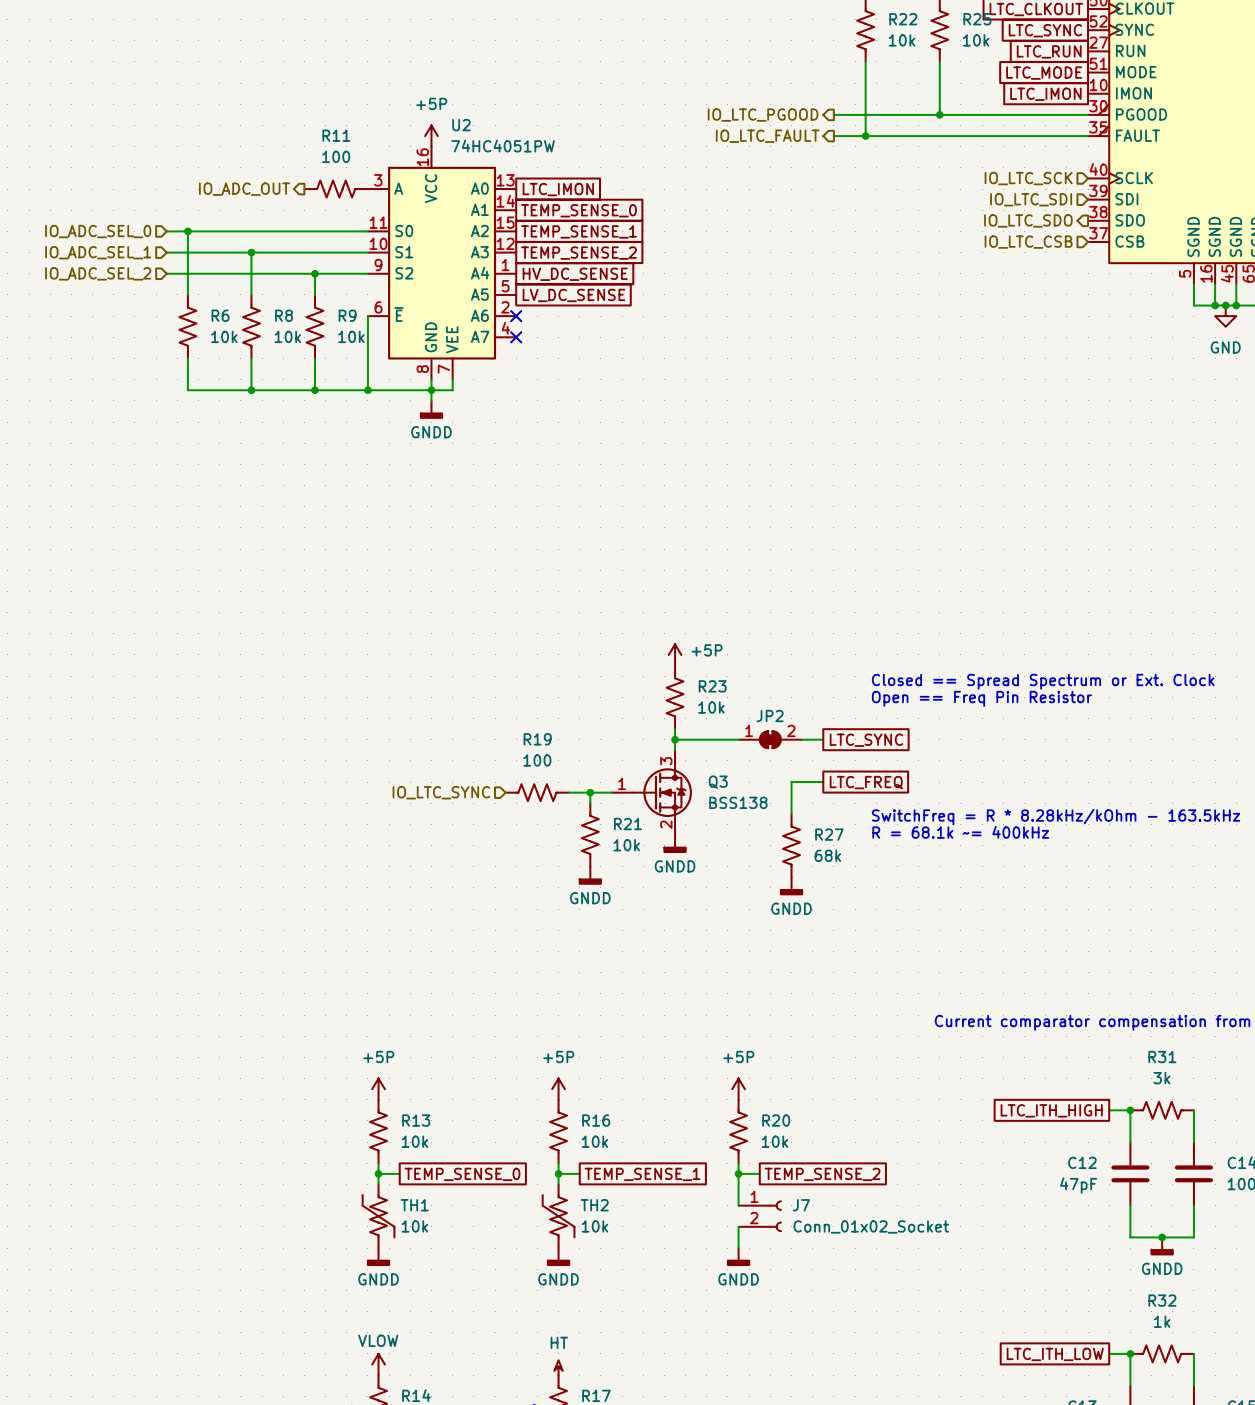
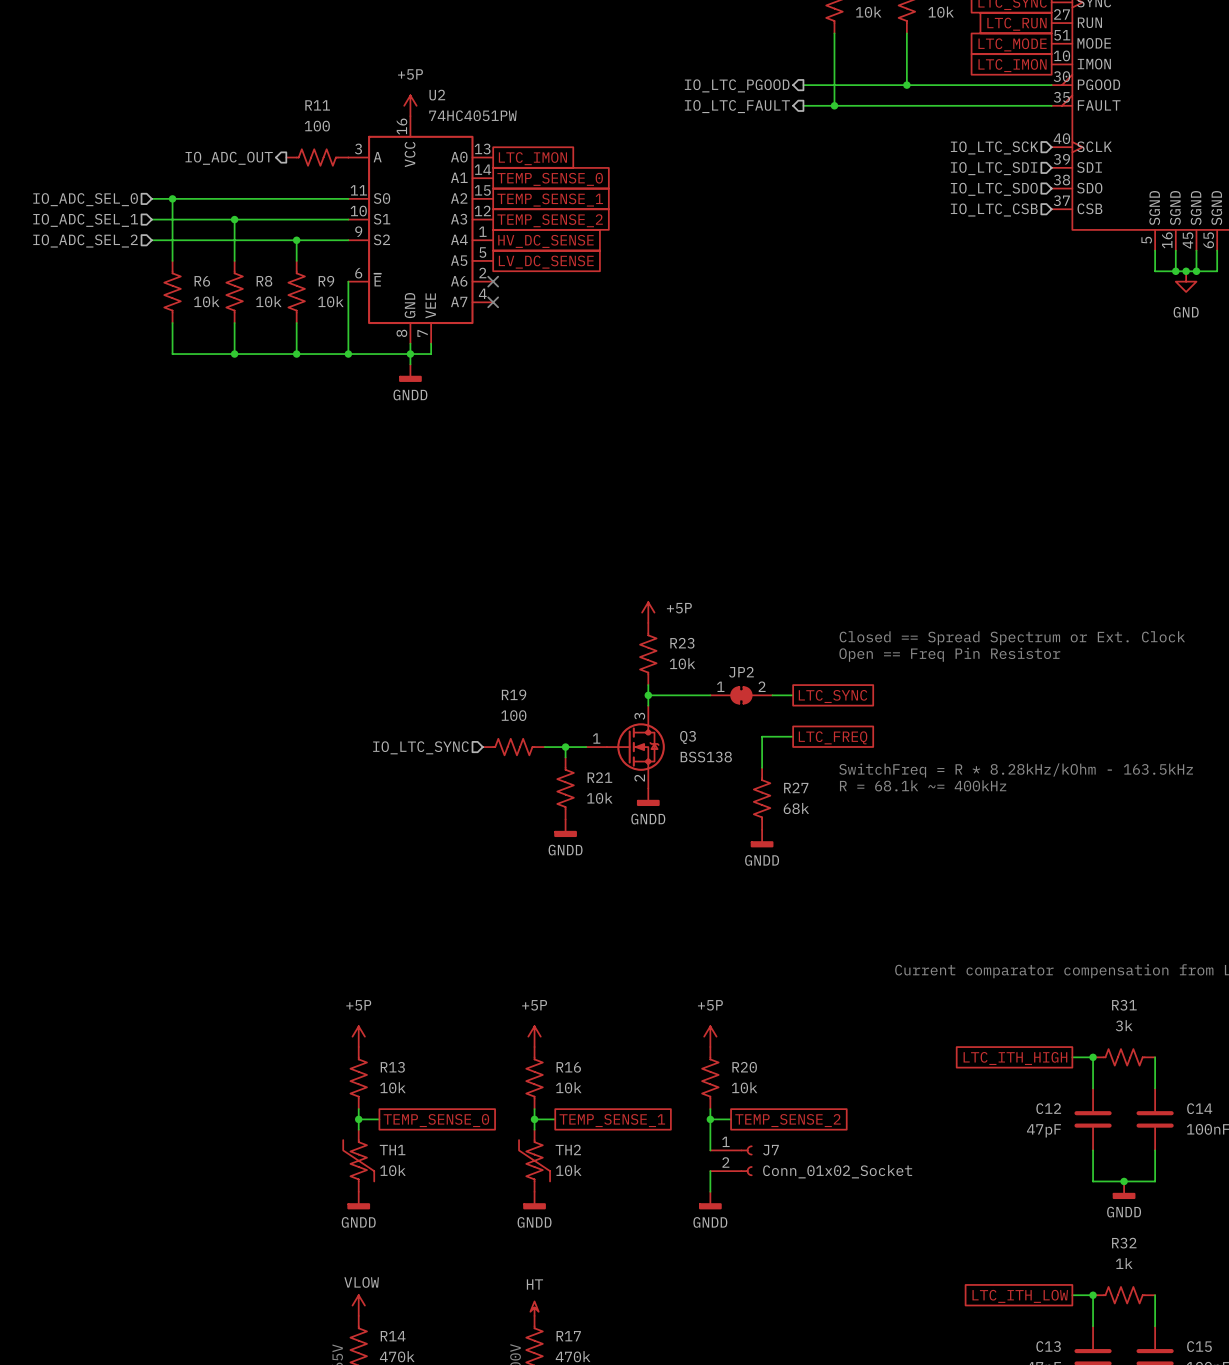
hierarchical label shape: output (1028, 220) -> input (994, 189)

